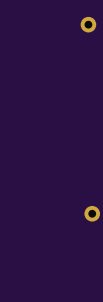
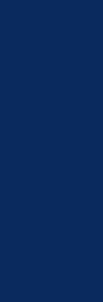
via: (88, 24) -> none
via: (92, 213) -> none

